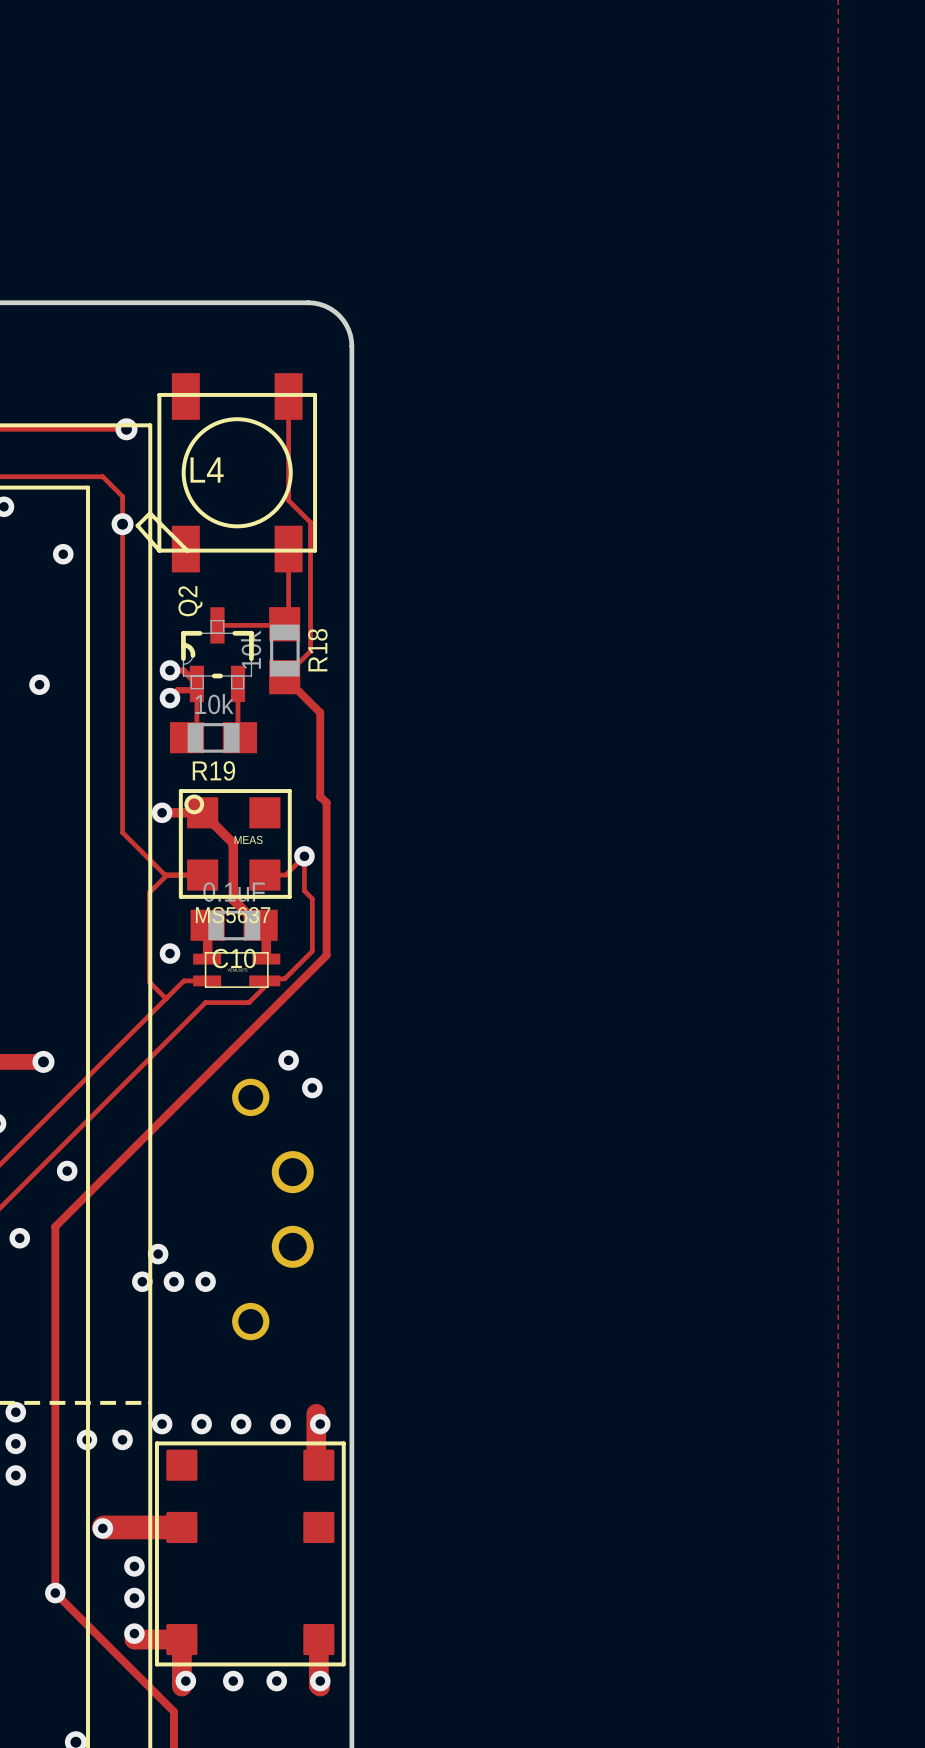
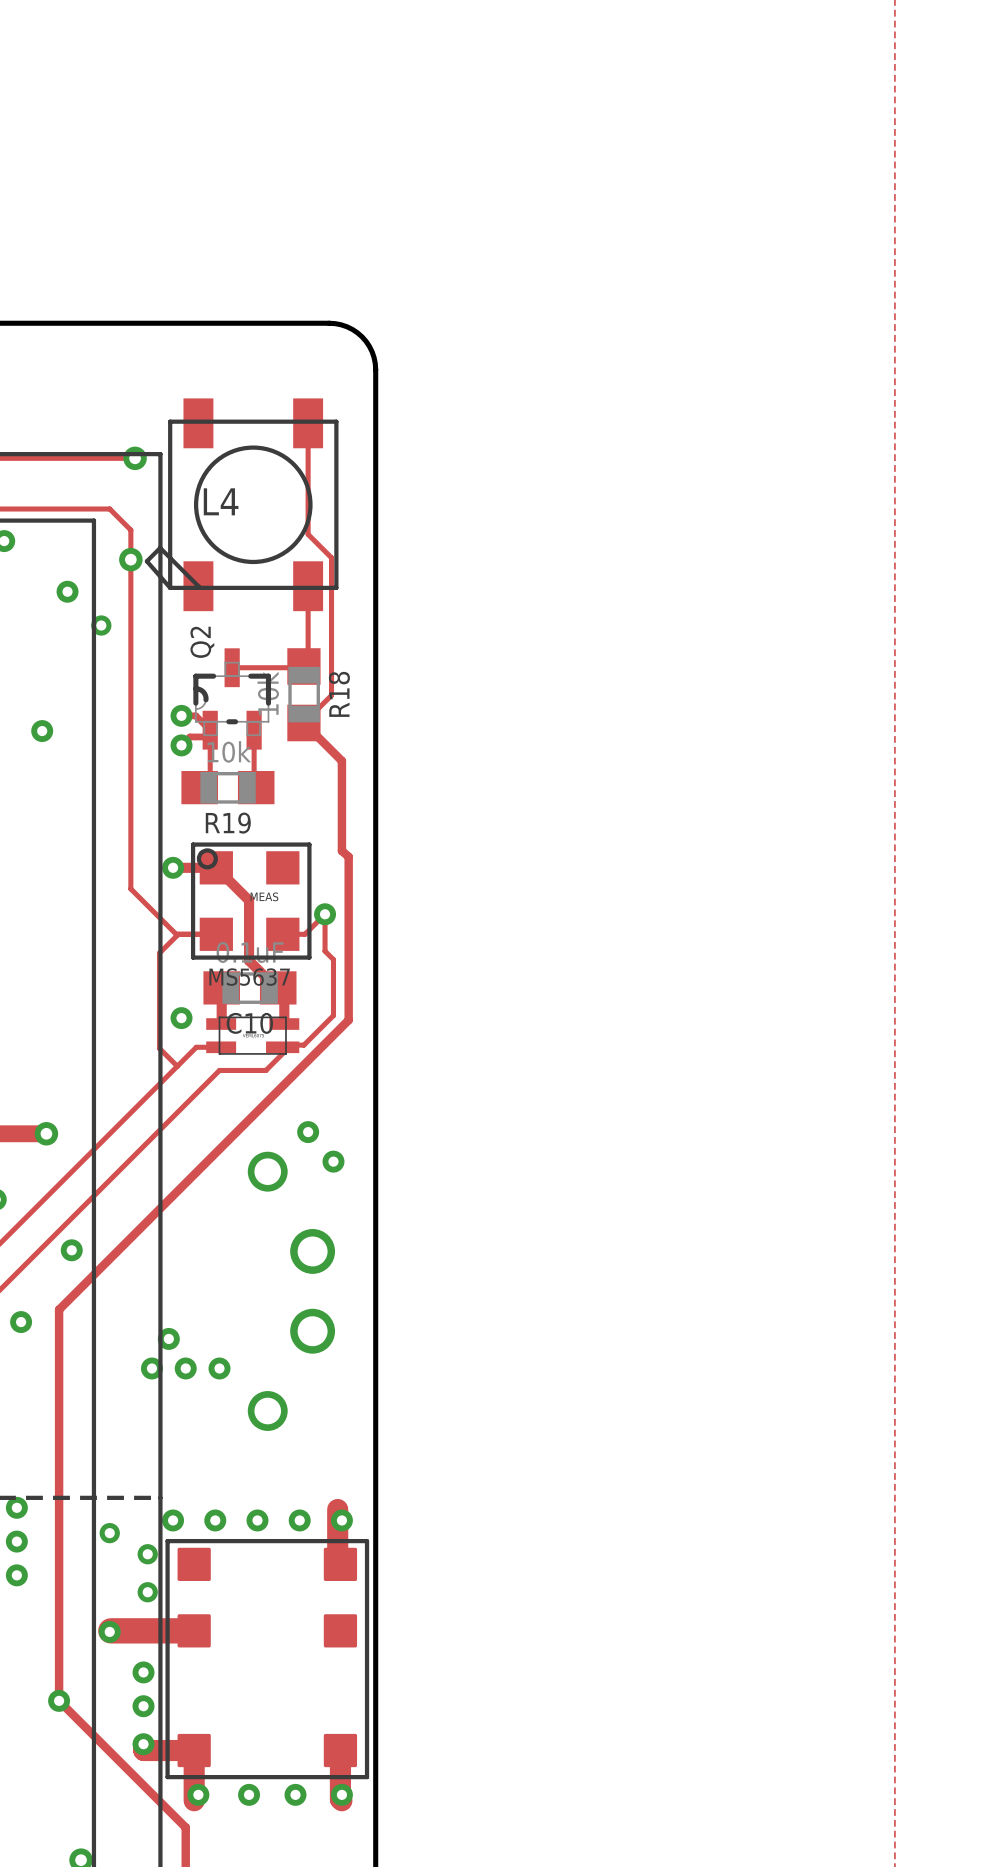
via: none -> (101, 625)
via: none -> (109, 1533)
via: (86, 1439) -> none
via: (122, 1439) -> none
via: none -> (147, 1554)
via: none -> (147, 1592)

